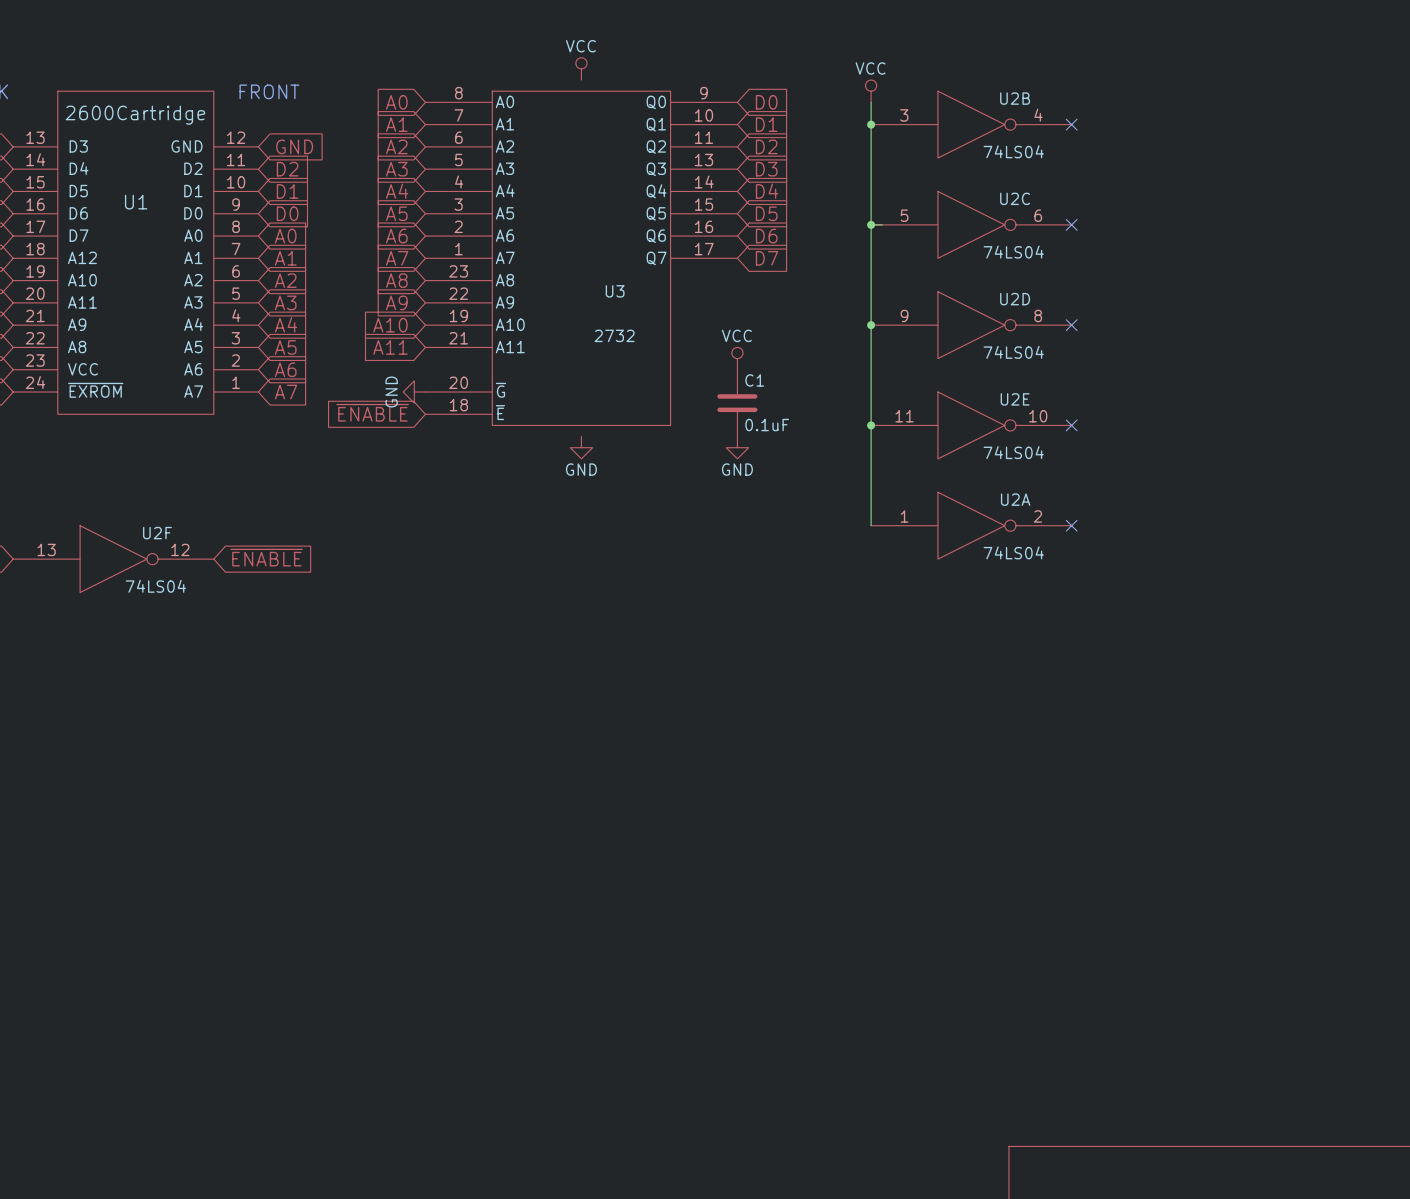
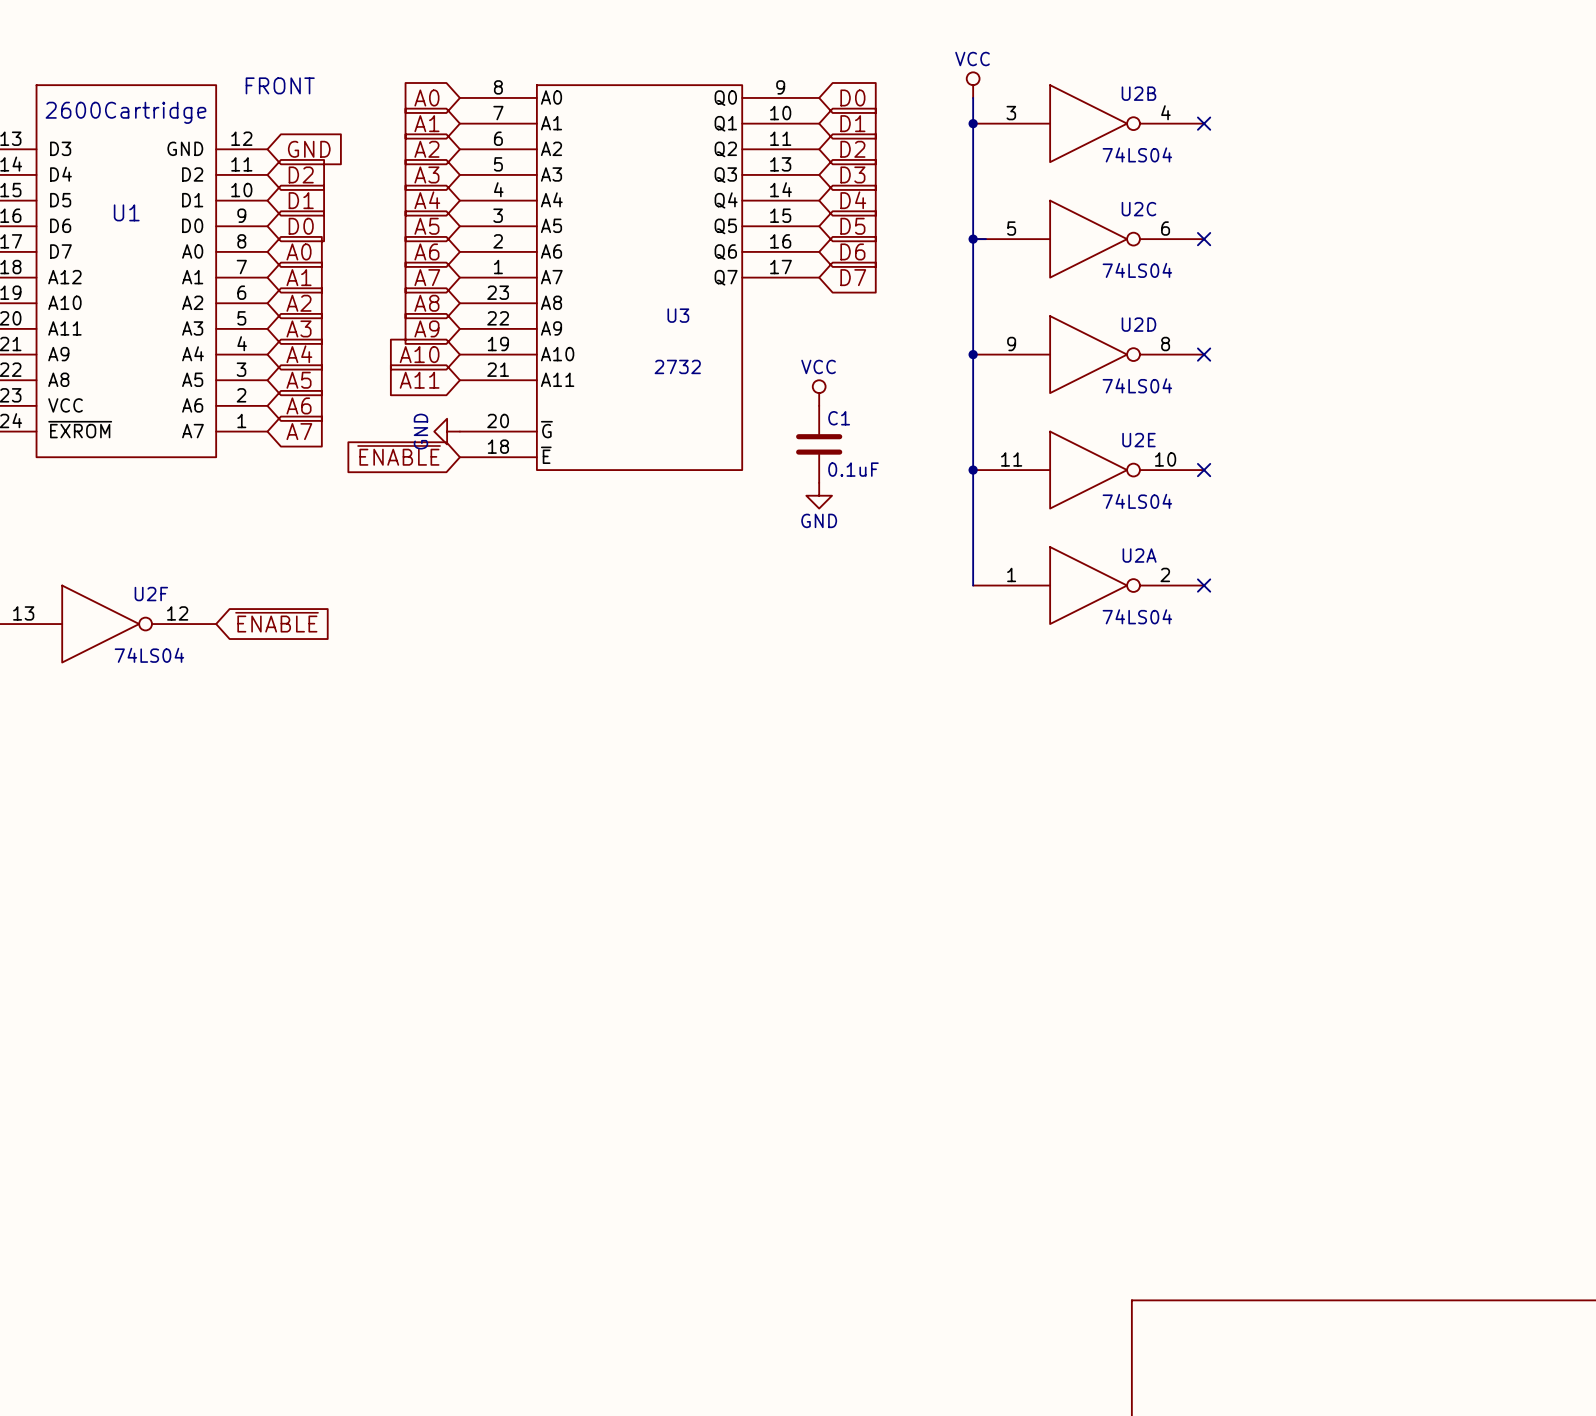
power symbol: VCC (581, 68) -> none
power symbol: GND (581, 447) -> none

